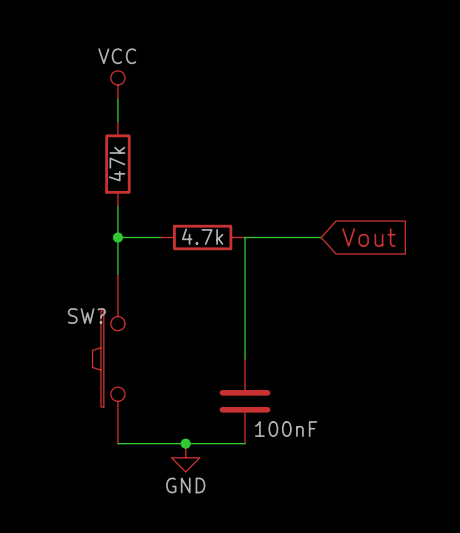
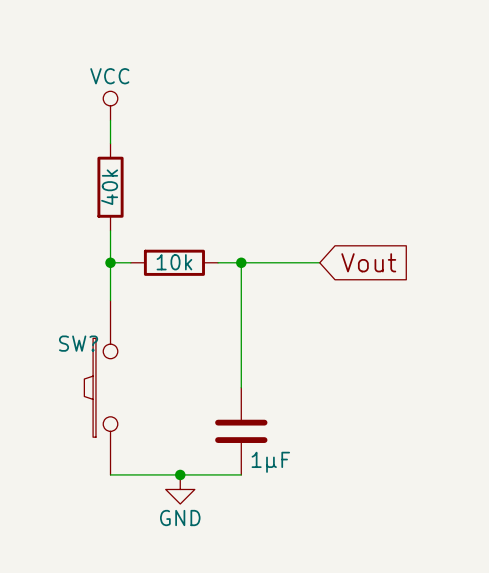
part value: 47k (117, 164) -> 40k (109, 187)
part: none -> 10k (174, 262)
part: 4.7k (202, 237) -> none
junction: none -> (241, 262)
part value: 100nF (286, 429) -> 1µF (270, 462)

